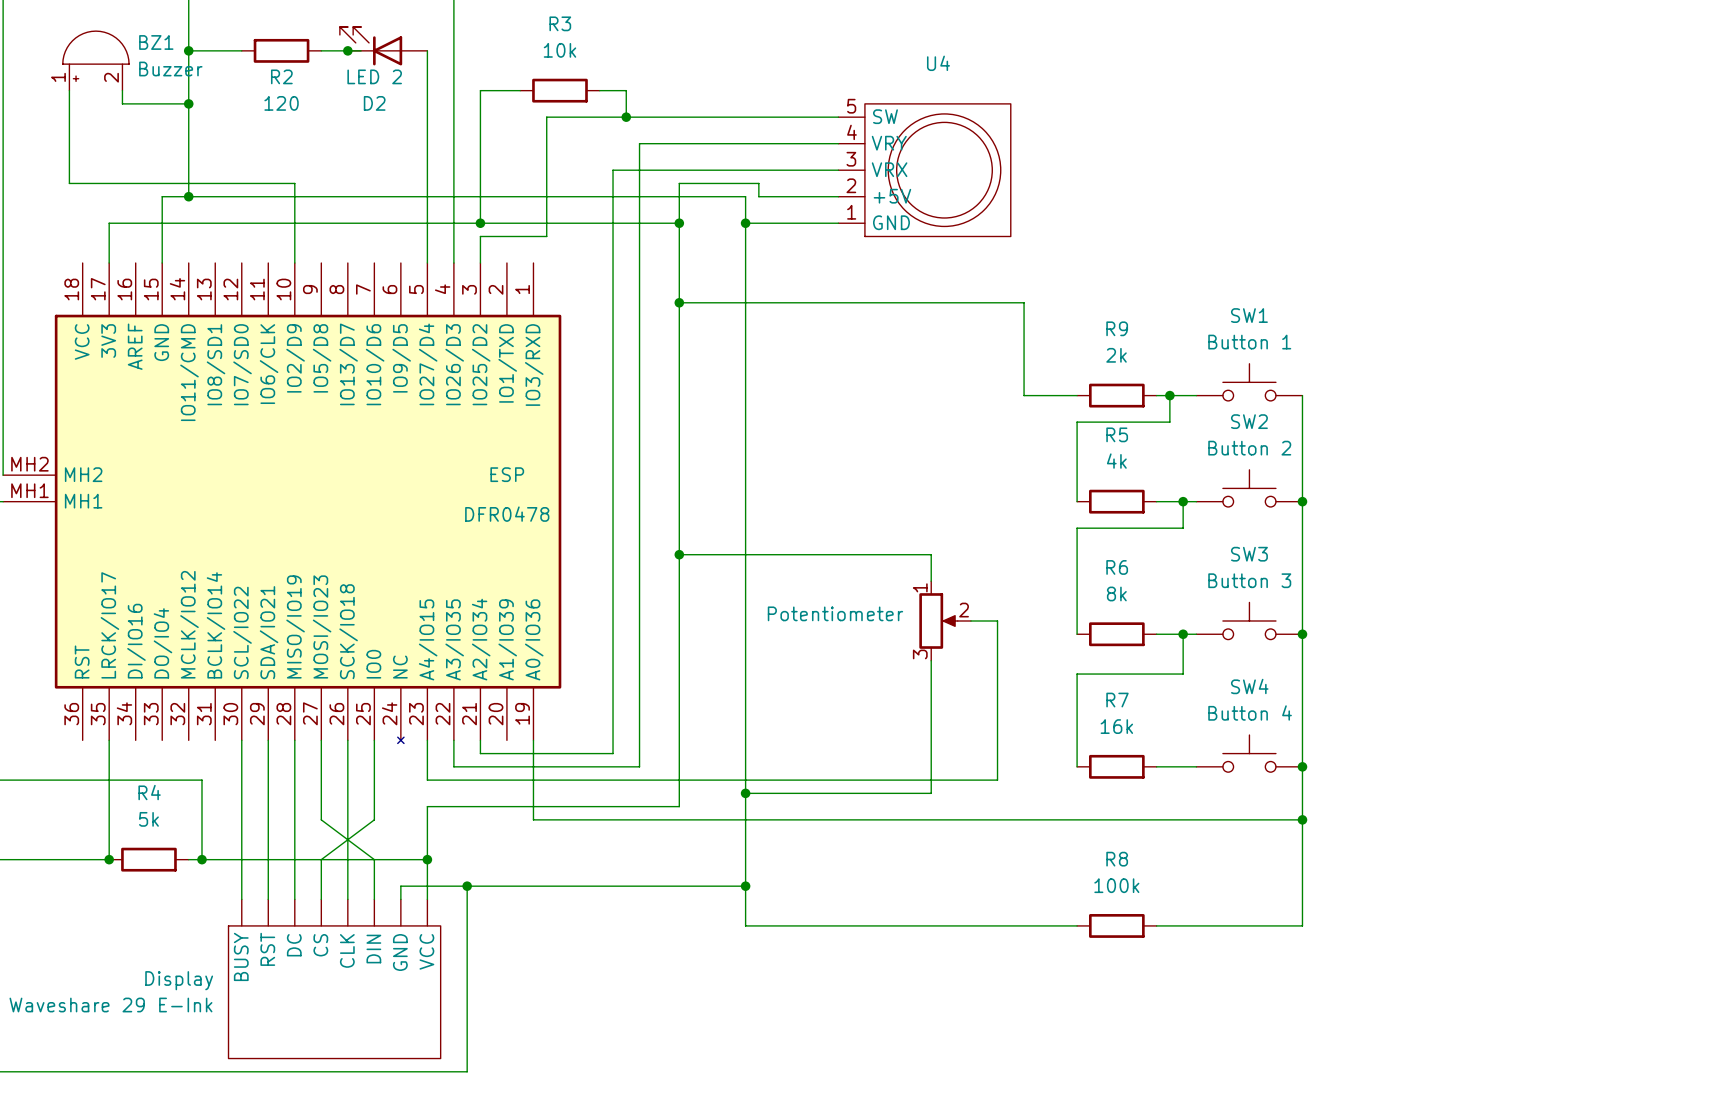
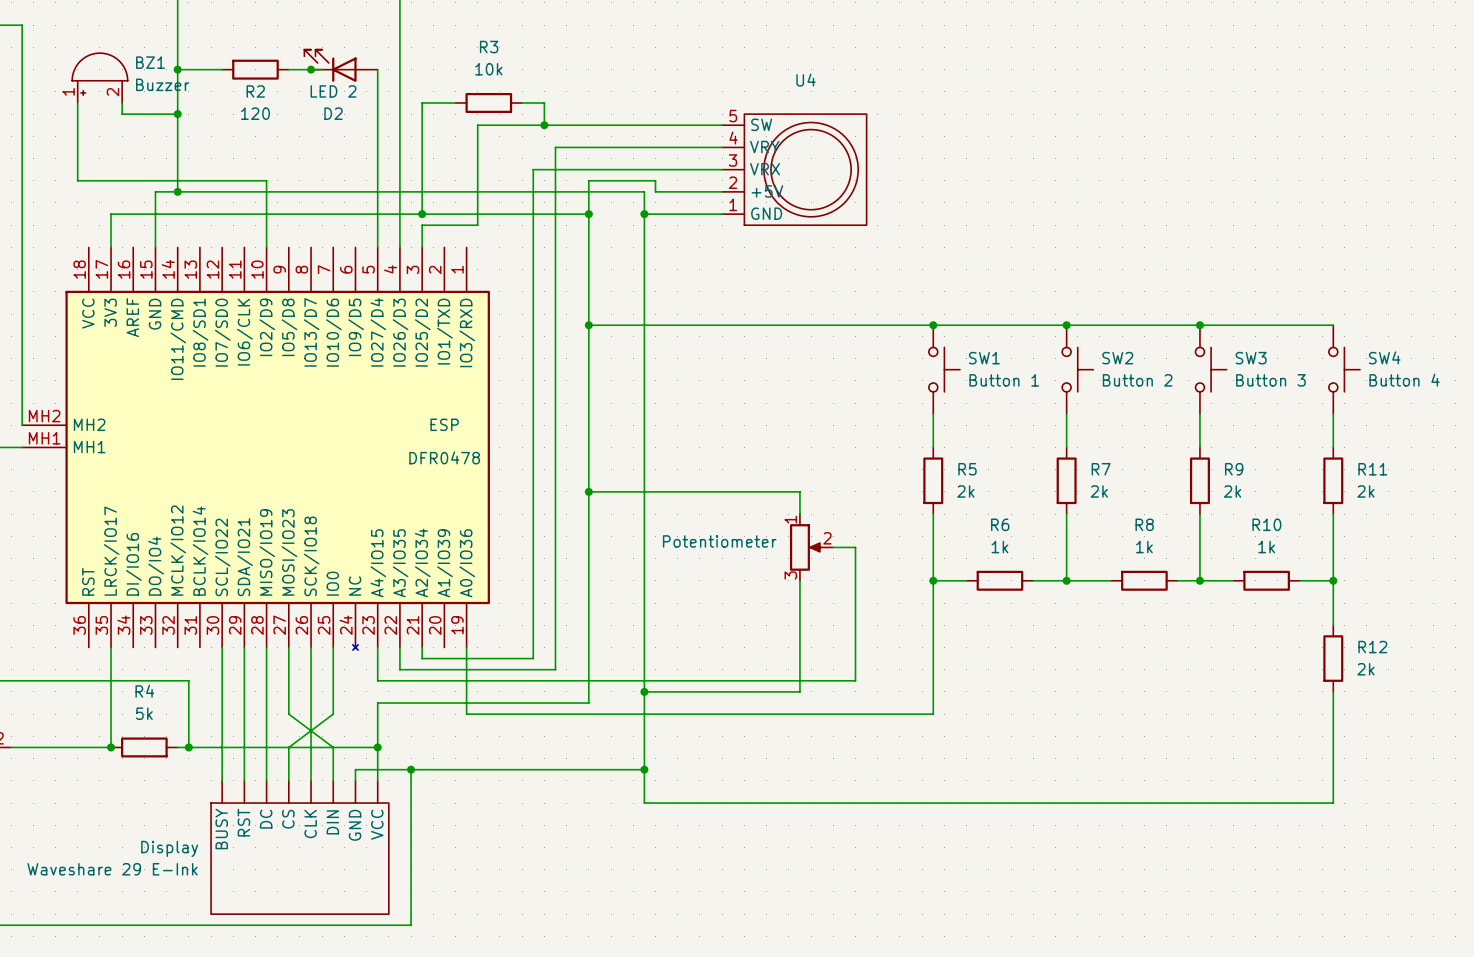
wire: (679, 302) (1024, 302) (1024, 395) (1077, 395) -> none
junction position: (679, 302) -> (588, 325)
R9 name position: R9 (1117, 328) -> R9 (1234, 469)
SW1 value position: Button 1 (1249, 342) -> Button 1 (1004, 380)
wire: none -> (588, 325) (1333, 325)
junction: none -> (933, 325)
junction: none -> (1066, 325)
junction: none -> (1199, 325)
SW1 rotation: 0° (1249, 382) -> 90° clockwise (944, 369)
SW1 position: (1249, 382) -> (944, 369)
R9 rotation: 0° (1116, 395) -> 90° clockwise (1199, 480)
R9 position: (1116, 395) -> (1199, 480)
wire: (1156, 395) (1196, 395) -> none
wire: (1169, 395) (1169, 422) (1077, 422) (1077, 501) -> none
junction: (1169, 395) -> none
wire: (1302, 395) (1302, 925) -> (1333, 691) (1333, 803) (1111, 803)
R5 name position: R5 (1117, 434) -> R5 (967, 469)
SW2 value position: Button 2 (1249, 448) -> Button 2 (1137, 380)
wire: none -> (933, 414) (933, 447)
R5 value: 4k (1116, 461) -> 2k (965, 491)
wire: none -> (1066, 414) (1066, 447)
wire: none -> (1199, 414) (1199, 447)
wire: none -> (1333, 414) (1333, 447)
SW2 rotation: 0° (1249, 488) -> 90° clockwise (1077, 369)
SW2 position: (1249, 488) -> (1077, 369)
R5 rotation: 0° (1116, 501) -> 90° clockwise (933, 480)
R5 position: (1116, 501) -> (933, 480)
wire: (1156, 501) (1196, 501) -> none
wire: (1183, 501) (1183, 528) (1077, 528) (1077, 634) -> none
junction: (1183, 501) -> none
junction: (1302, 501) -> none
R11: none -> 2k (1333, 480)
SW3 value position: Button 3 (1249, 580) -> Button 3 (1270, 380)
wire: none -> (1066, 514) (1066, 580)
wire: none -> (1199, 514) (1199, 580)
wire: none -> (1333, 514) (1333, 625)
R6 value: 8k (1116, 593) -> 1k (999, 547)
SW3 rotation: 0° (1249, 620) -> 90° clockwise (1211, 369)
SW3 position: (1249, 620) -> (1211, 369)
R6 position: (1116, 634) -> (999, 580)
wire: (1156, 634) (1196, 634) -> (933, 580) (966, 580)
wire: (1183, 634) (1183, 674) (1077, 674) (1077, 766) -> none
junction: (1183, 634) -> none
junction: (1302, 634) -> none
junction: none -> (933, 580)
wire: none -> (1033, 580) (1111, 580)
junction: none -> (1066, 580)
wire: none -> (1177, 580) (1233, 580)
junction: none -> (1199, 580)
R10: none -> 1k (1266, 580)
wire: none -> (1299, 580) (1333, 580)
junction: none -> (1333, 580)
R7 name position: R7 (1117, 700) -> R7 (1101, 469)
SW4 value position: Button 4 (1250, 712) -> Button 4 (1404, 380)
R7 value: 16k (1116, 726) -> 2k (1099, 491)
SW4 rotation: 0° (1249, 753) -> 90° clockwise (1344, 369)
SW4 position: (1249, 753) -> (1344, 369)
R12: none -> 2k (1333, 658)
R7 rotation: 0° (1116, 766) -> 90° clockwise (1066, 480)
R7 position: (1116, 766) -> (1066, 480)
wire: (1156, 766) (1196, 766) -> none
junction: (1302, 766) -> none
wire: (1090, 819) (1302, 819) -> (933, 714) (933, 514)
junction: (1302, 819) -> none
R8 value: 100k (1116, 885) -> 1k (1144, 547)
wire: none -> (922, 803) (988, 803)
R8 position: (1116, 925) -> (1144, 580)

